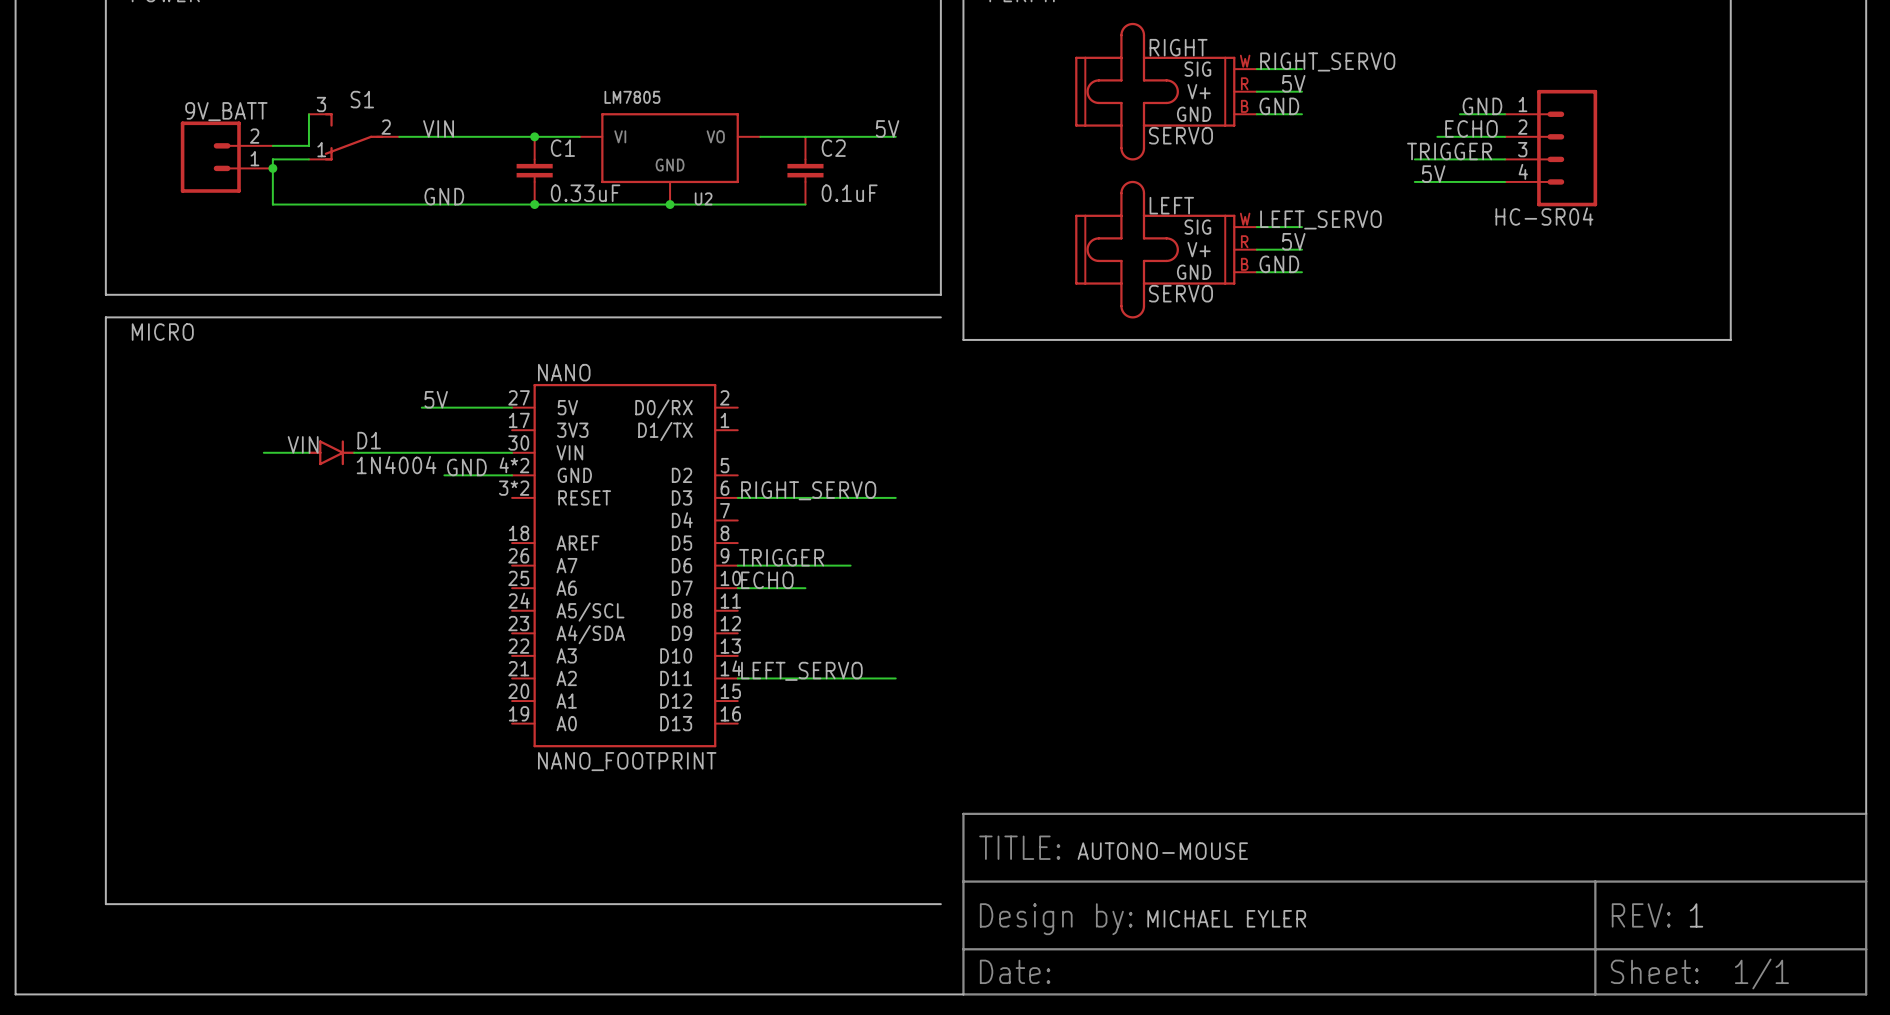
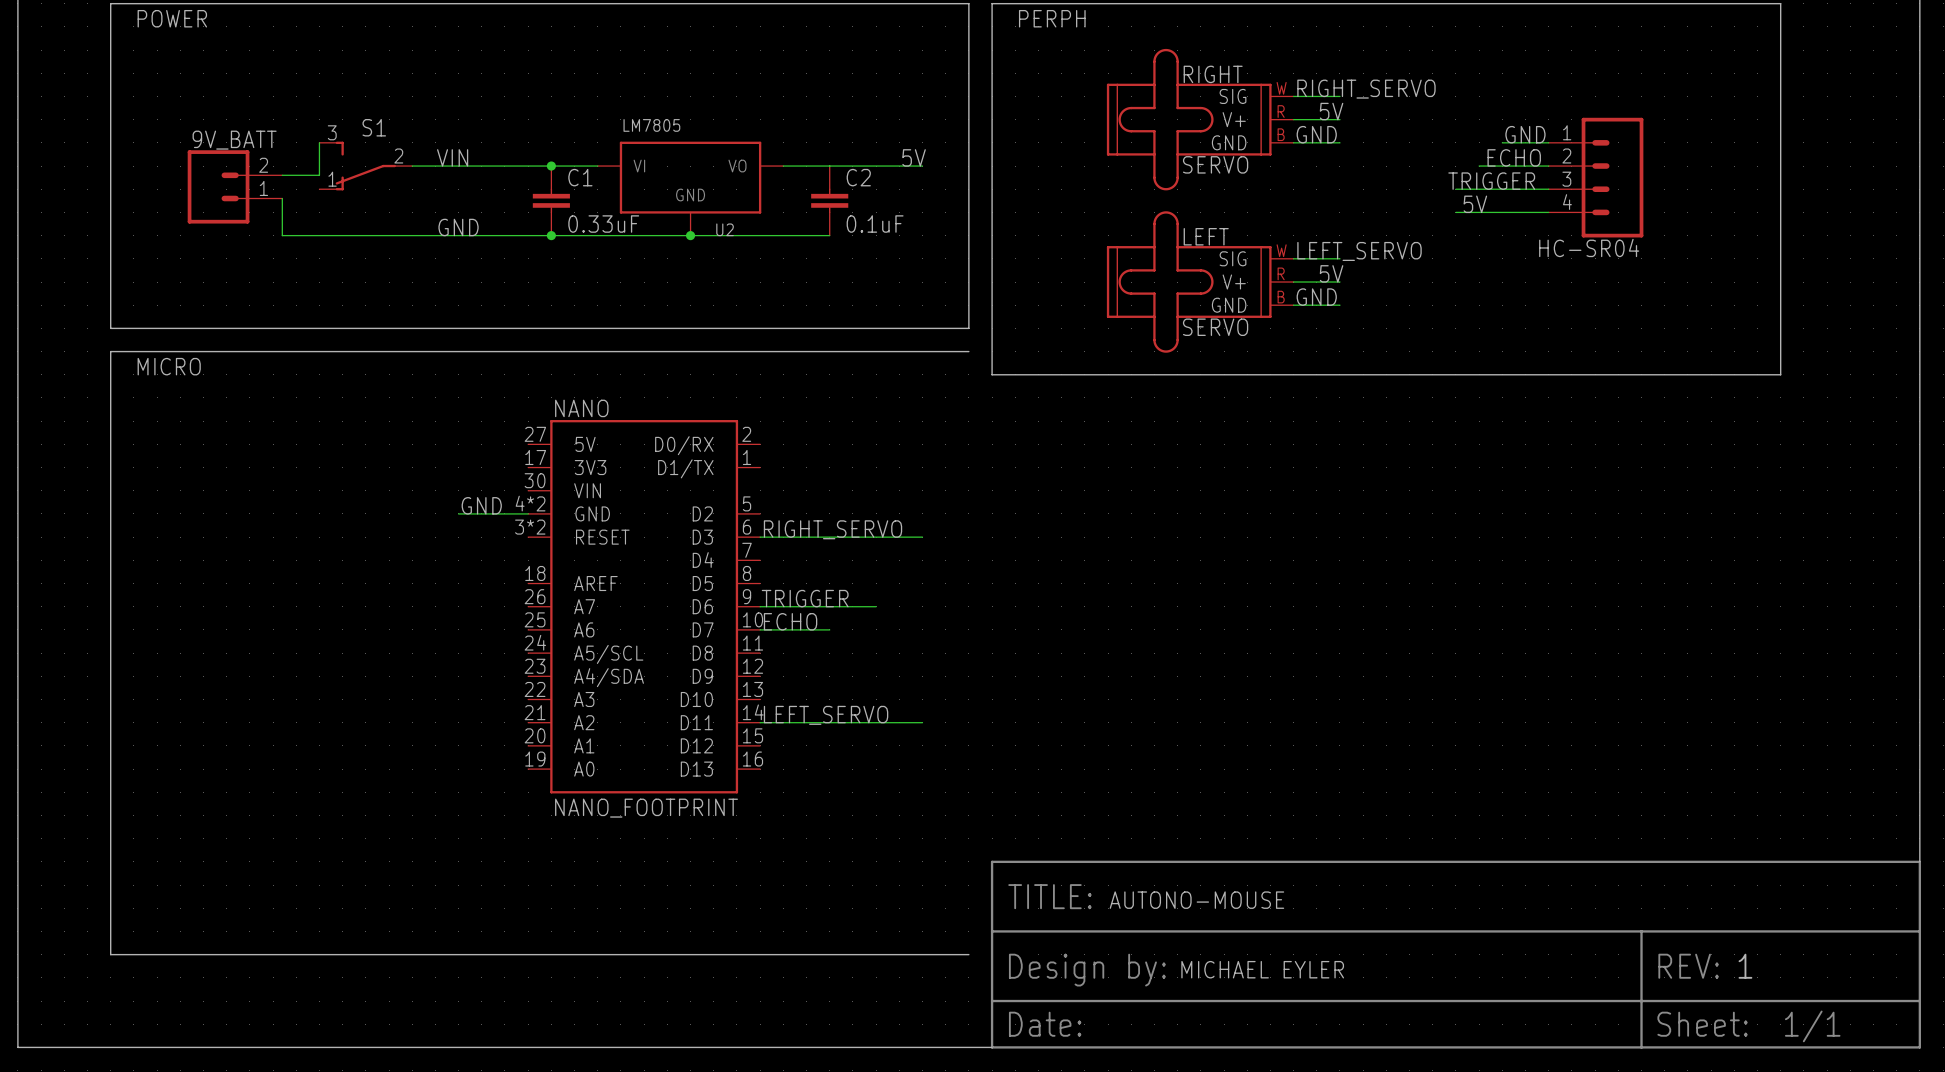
wire: (308, 159) (272, 159) (272, 168) -> none
junction: (272, 168) -> none
label: 5V (436, 399) -> none
wire: (421, 407) (512, 407) -> none
label: VIN (303, 444) -> none
wire: (263, 452) (308, 452) -> none
D1: 1N4004 (331, 452) -> none
wire: (354, 452) (512, 452) -> none

